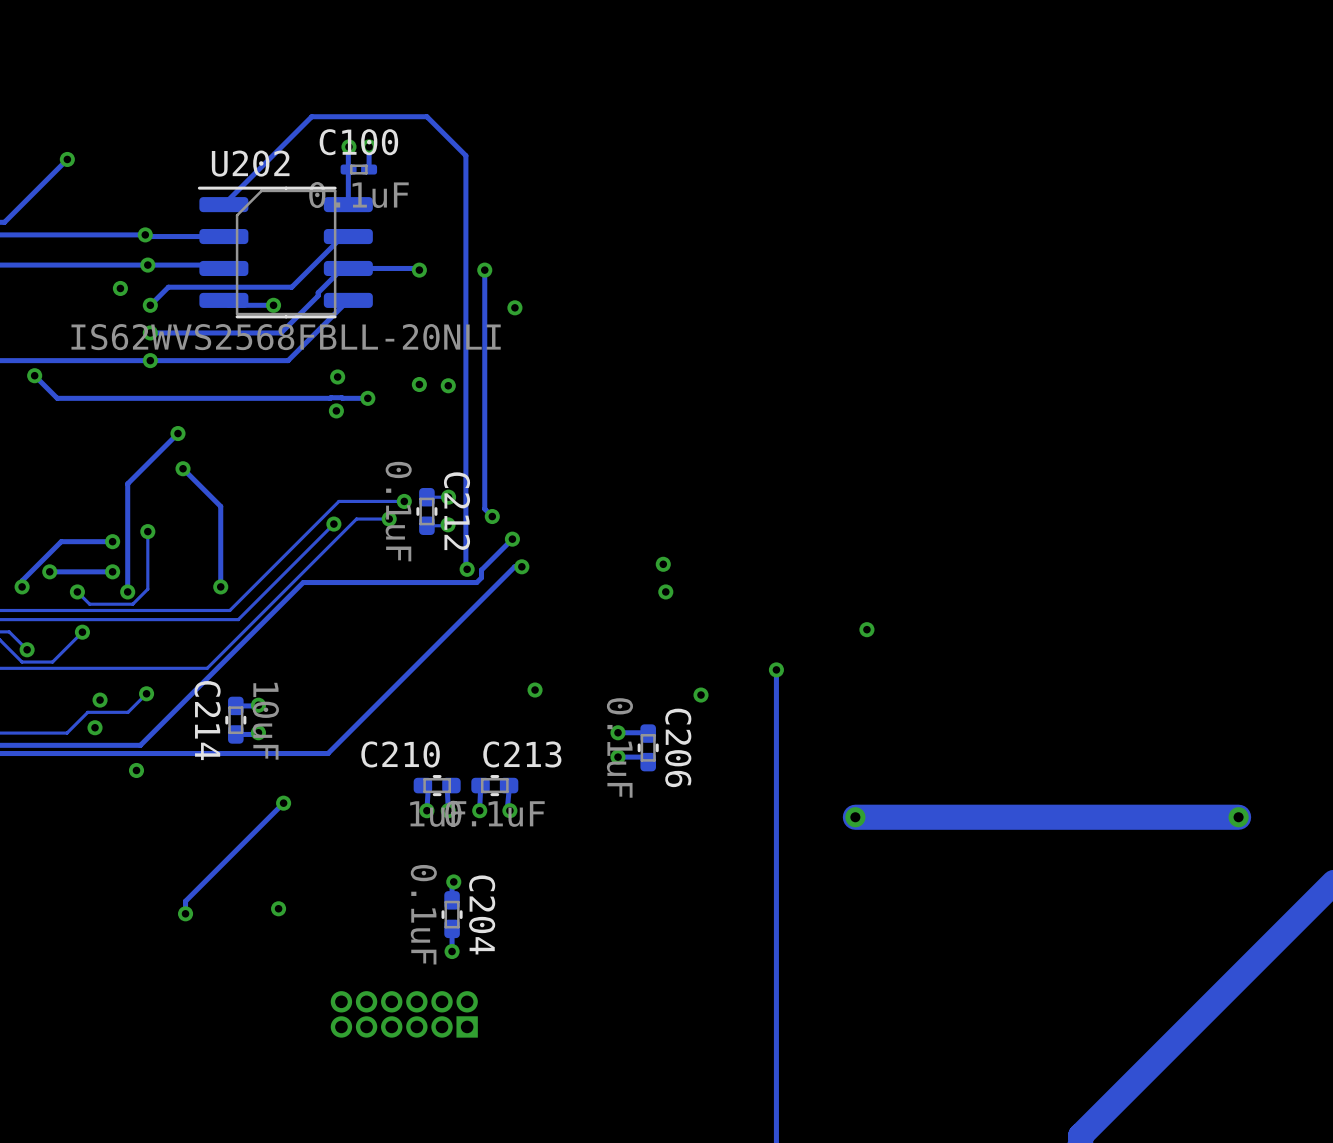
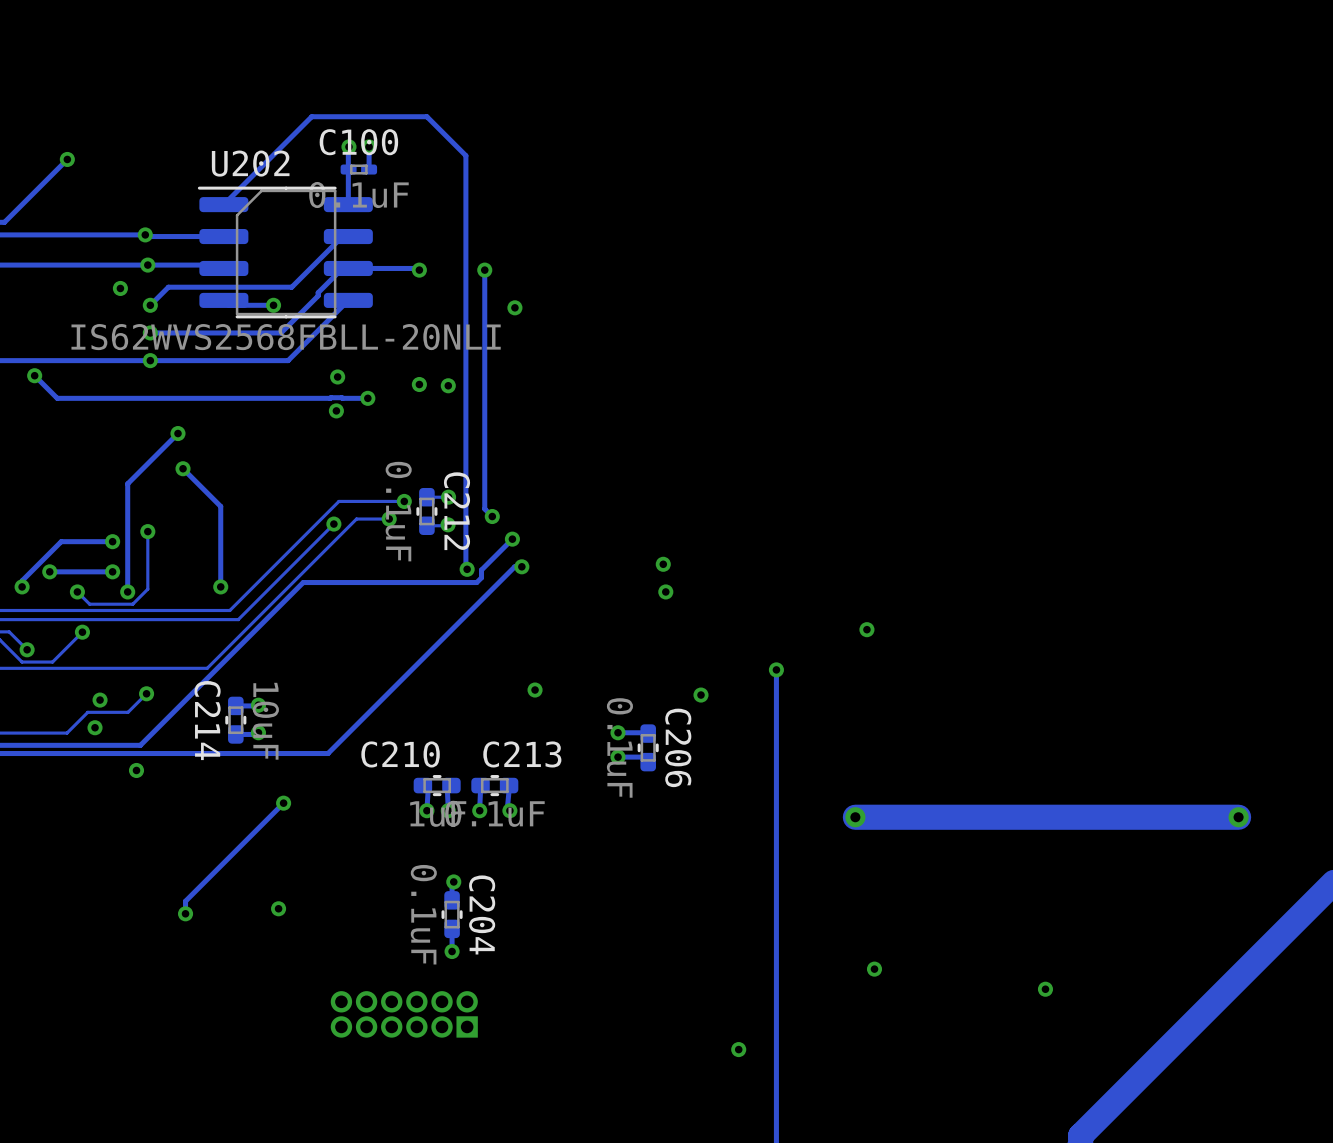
via: none -> (874, 969)
via: none -> (1045, 989)
via: none -> (738, 1049)

